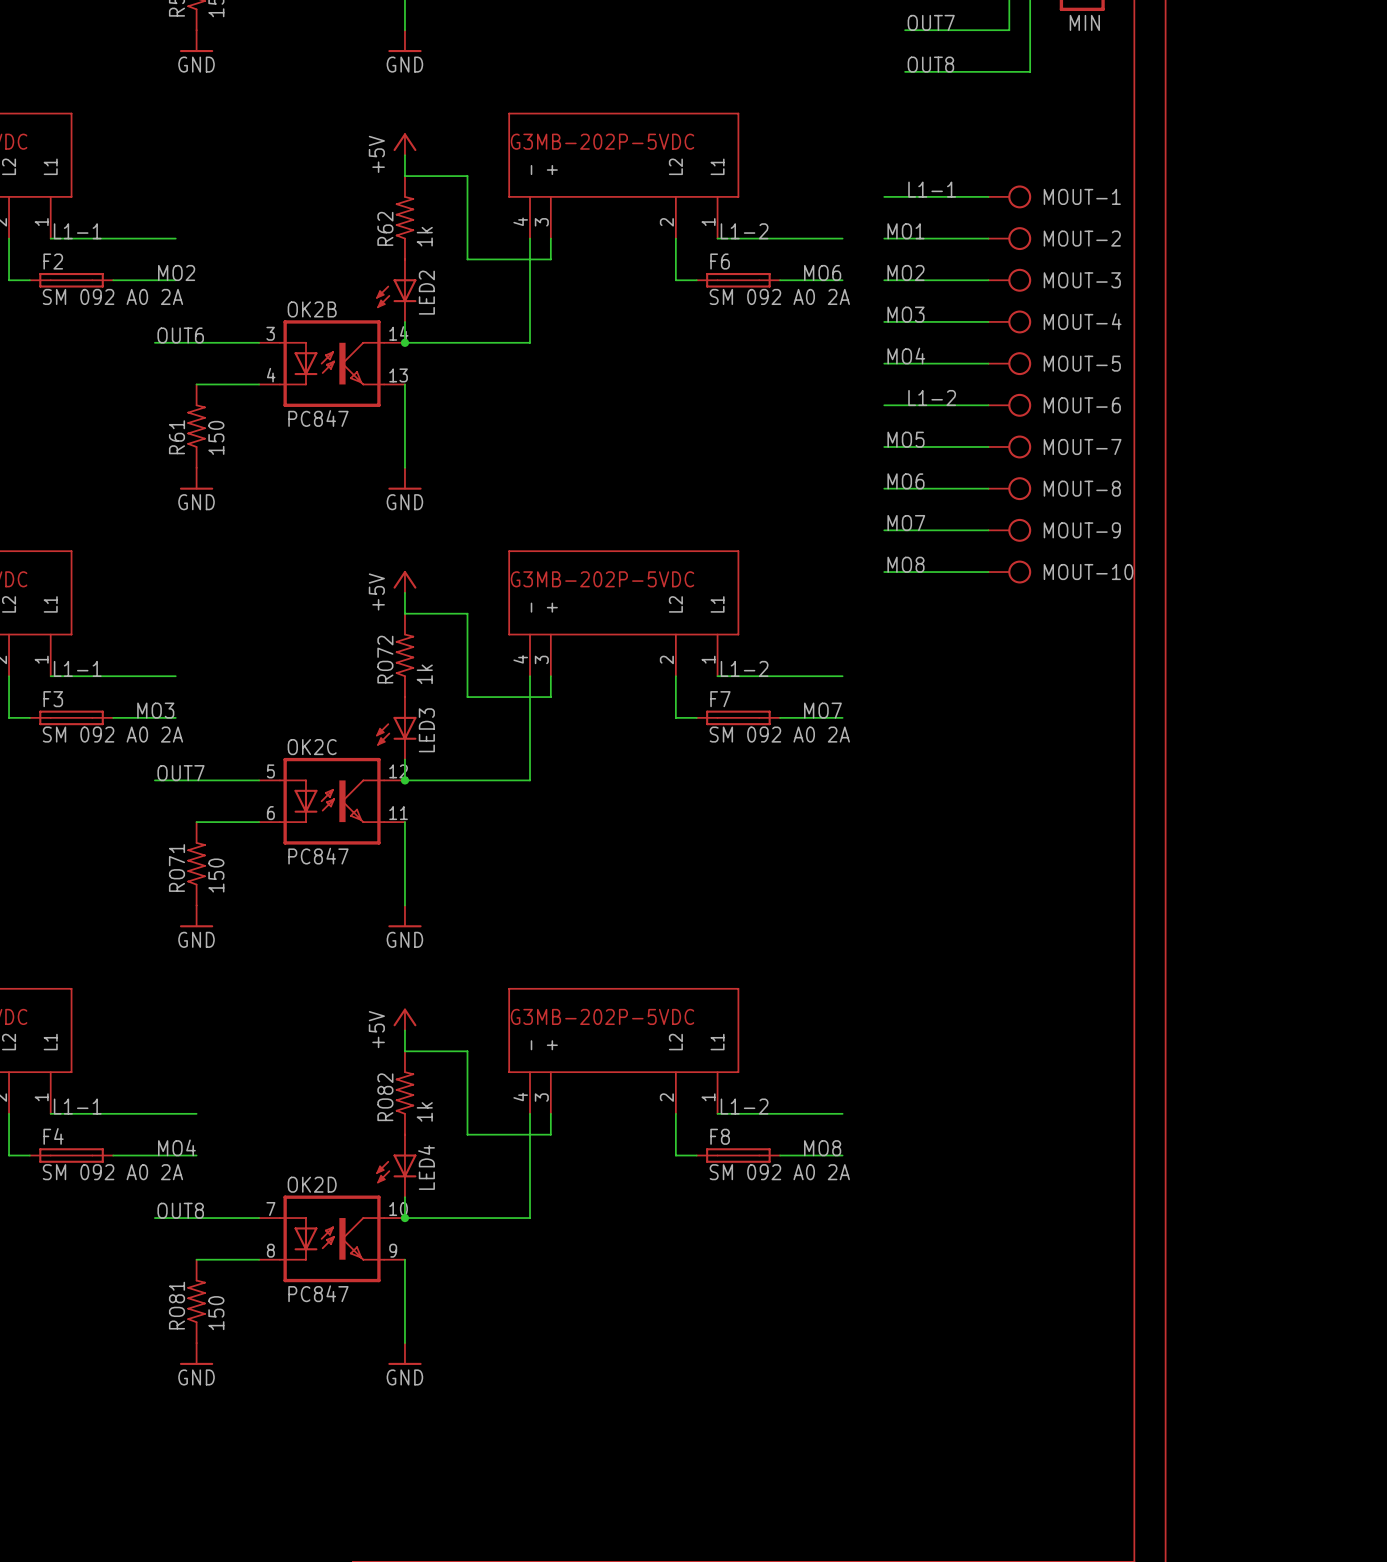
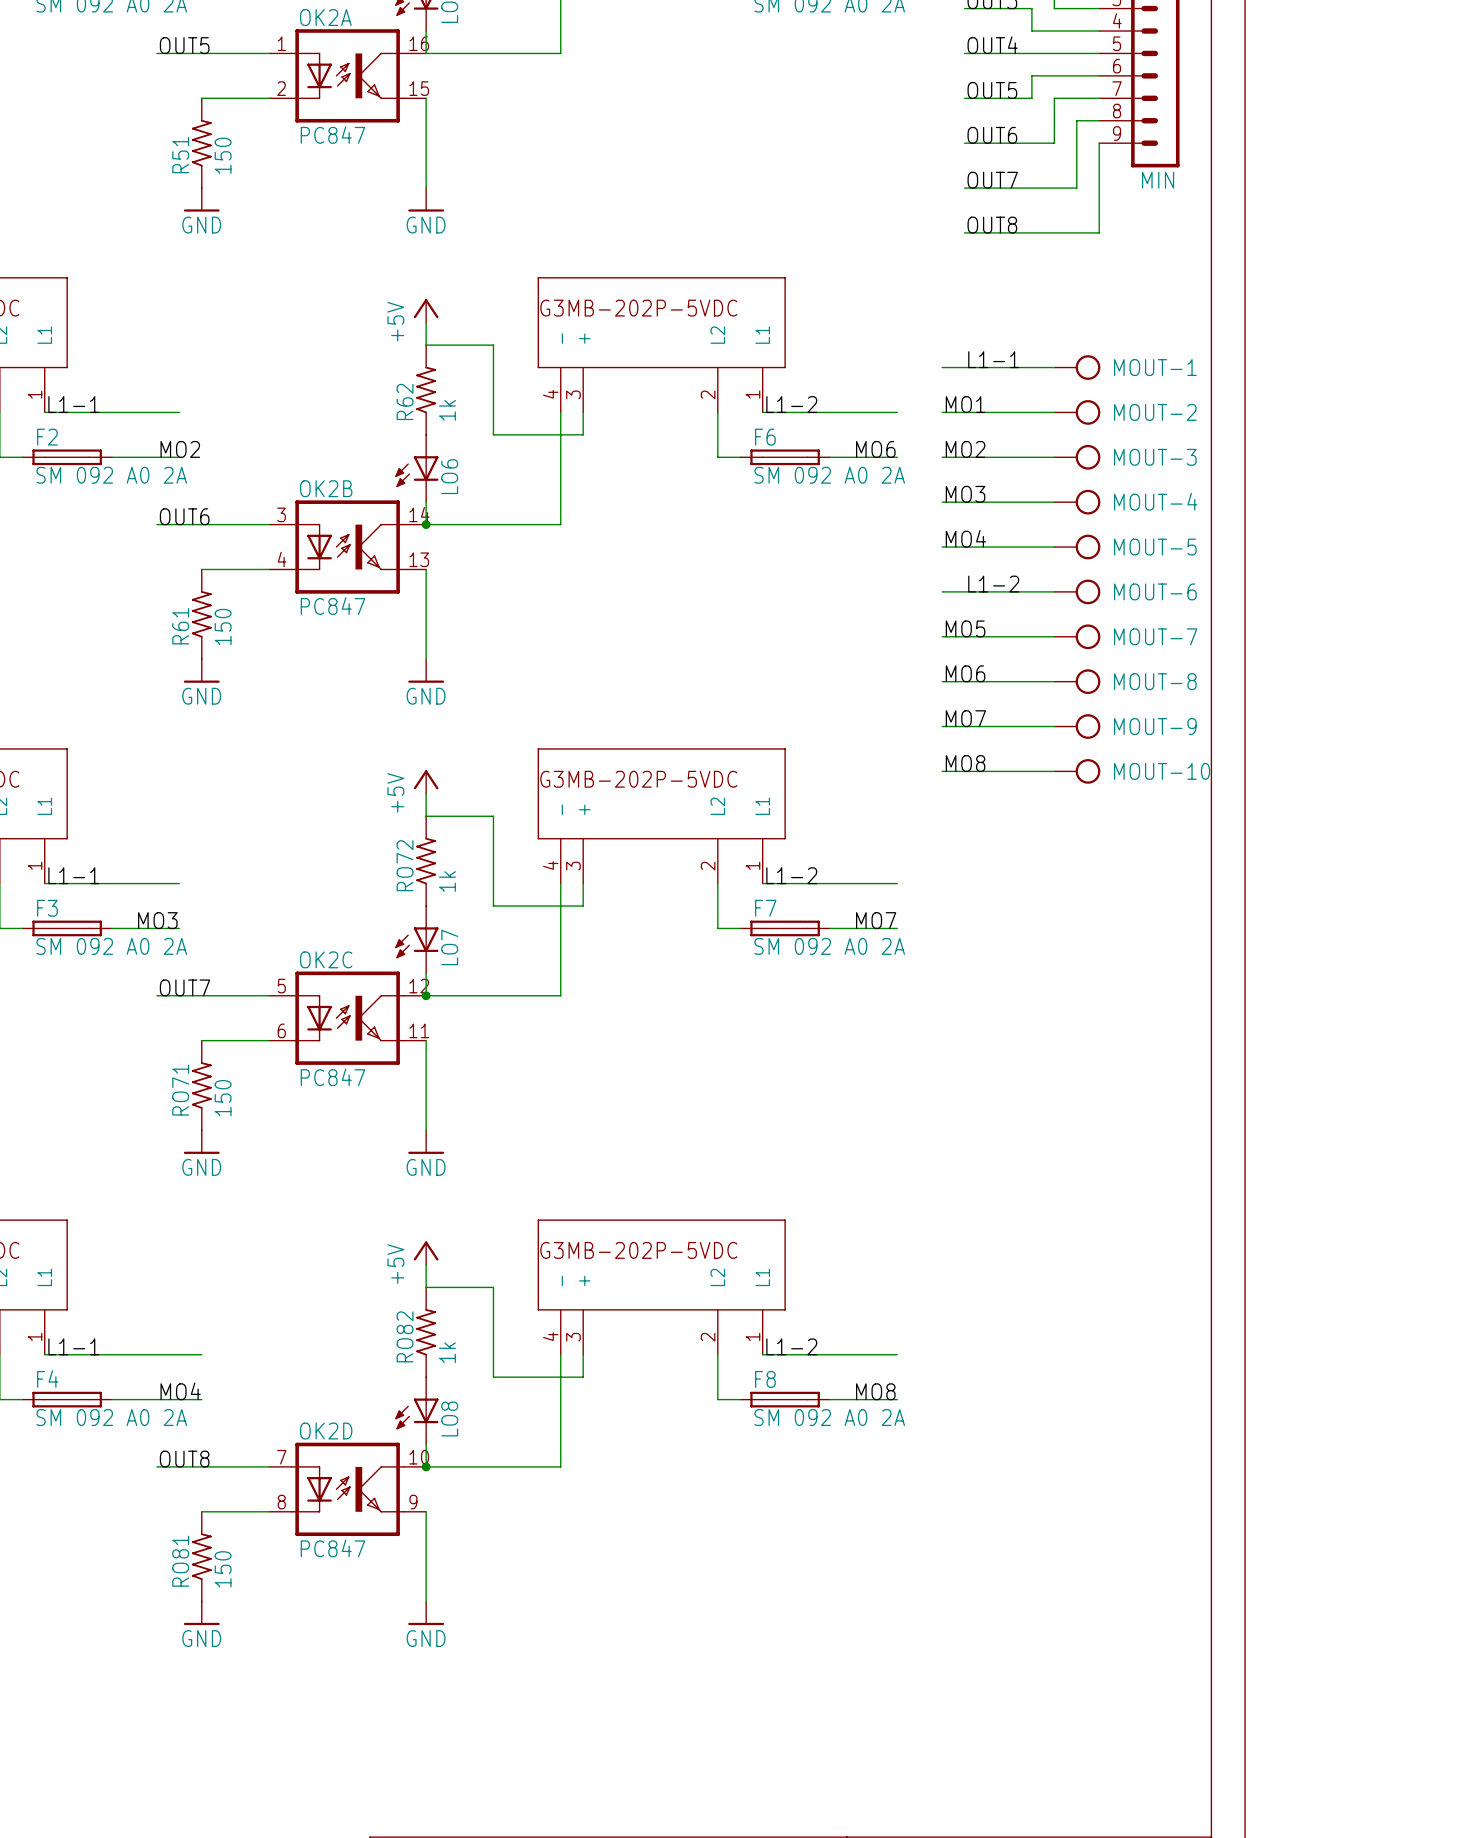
LED2 name: LED2 (426, 292) -> LO6 (449, 476)
LED3 name: LED3 (426, 730) -> LO7 (449, 947)
LED4 name: LED4 (426, 1167) -> LO8 (449, 1418)

